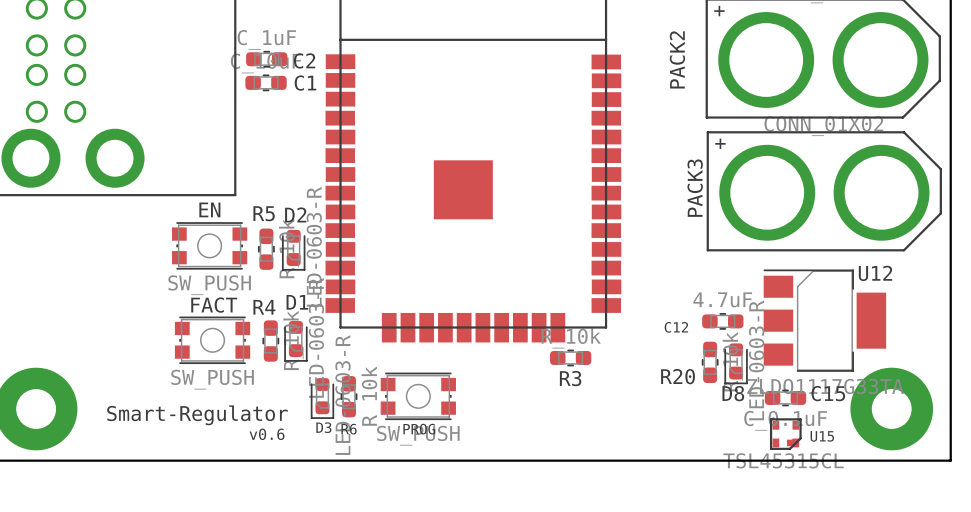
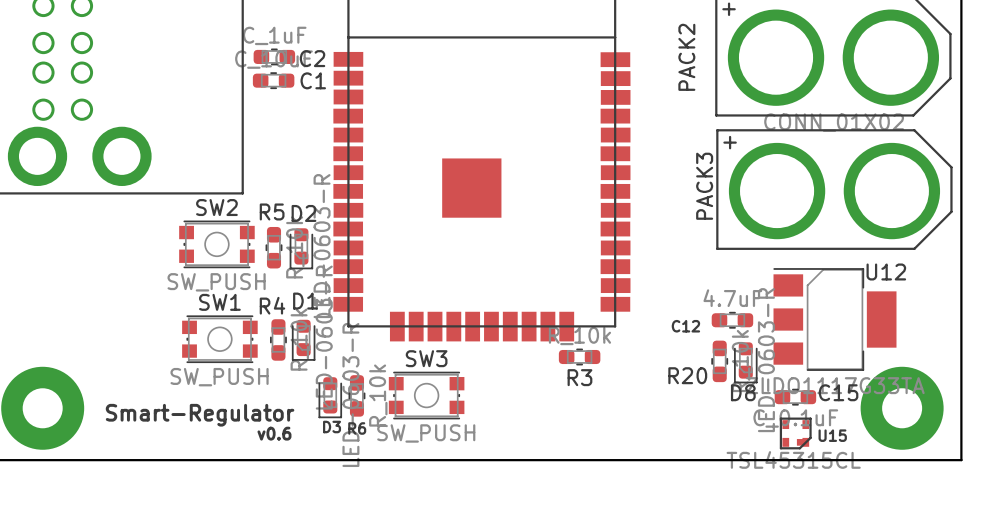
EN name: EN (209, 209) -> SW2 (216, 207)
FACT name: FACT (214, 305) -> SW1 (219, 302)
PROG name: PROG (419, 429) -> SW3 (426, 358)

